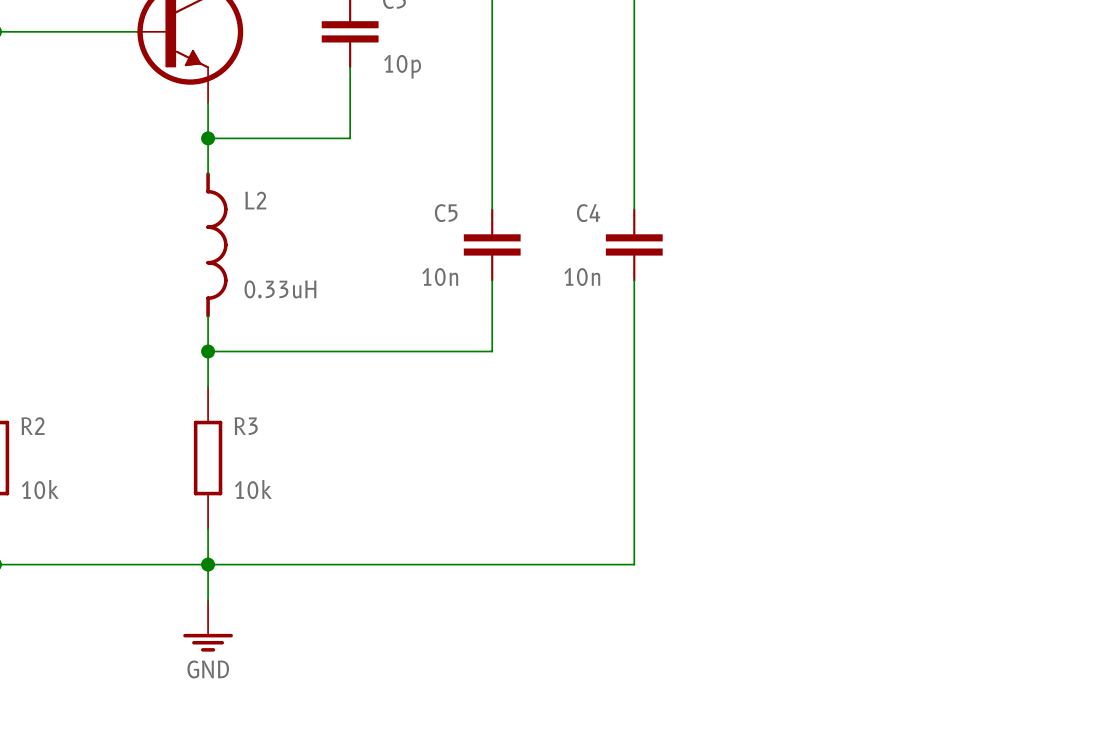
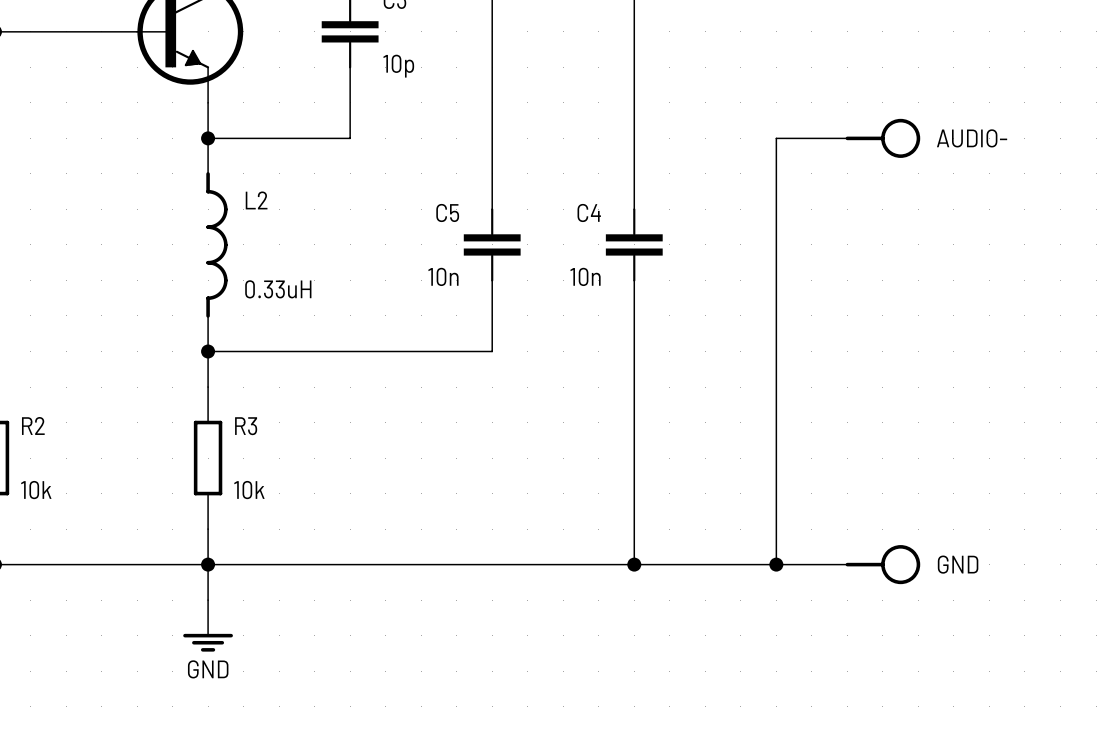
wire: none -> (847, 138) (776, 138) (776, 564)
AUDIO-: none -> (882, 138)
wire: none -> (634, 564) (847, 564)
junction: none -> (634, 564)
junction: none -> (776, 564)
GND: none -> (882, 564)

